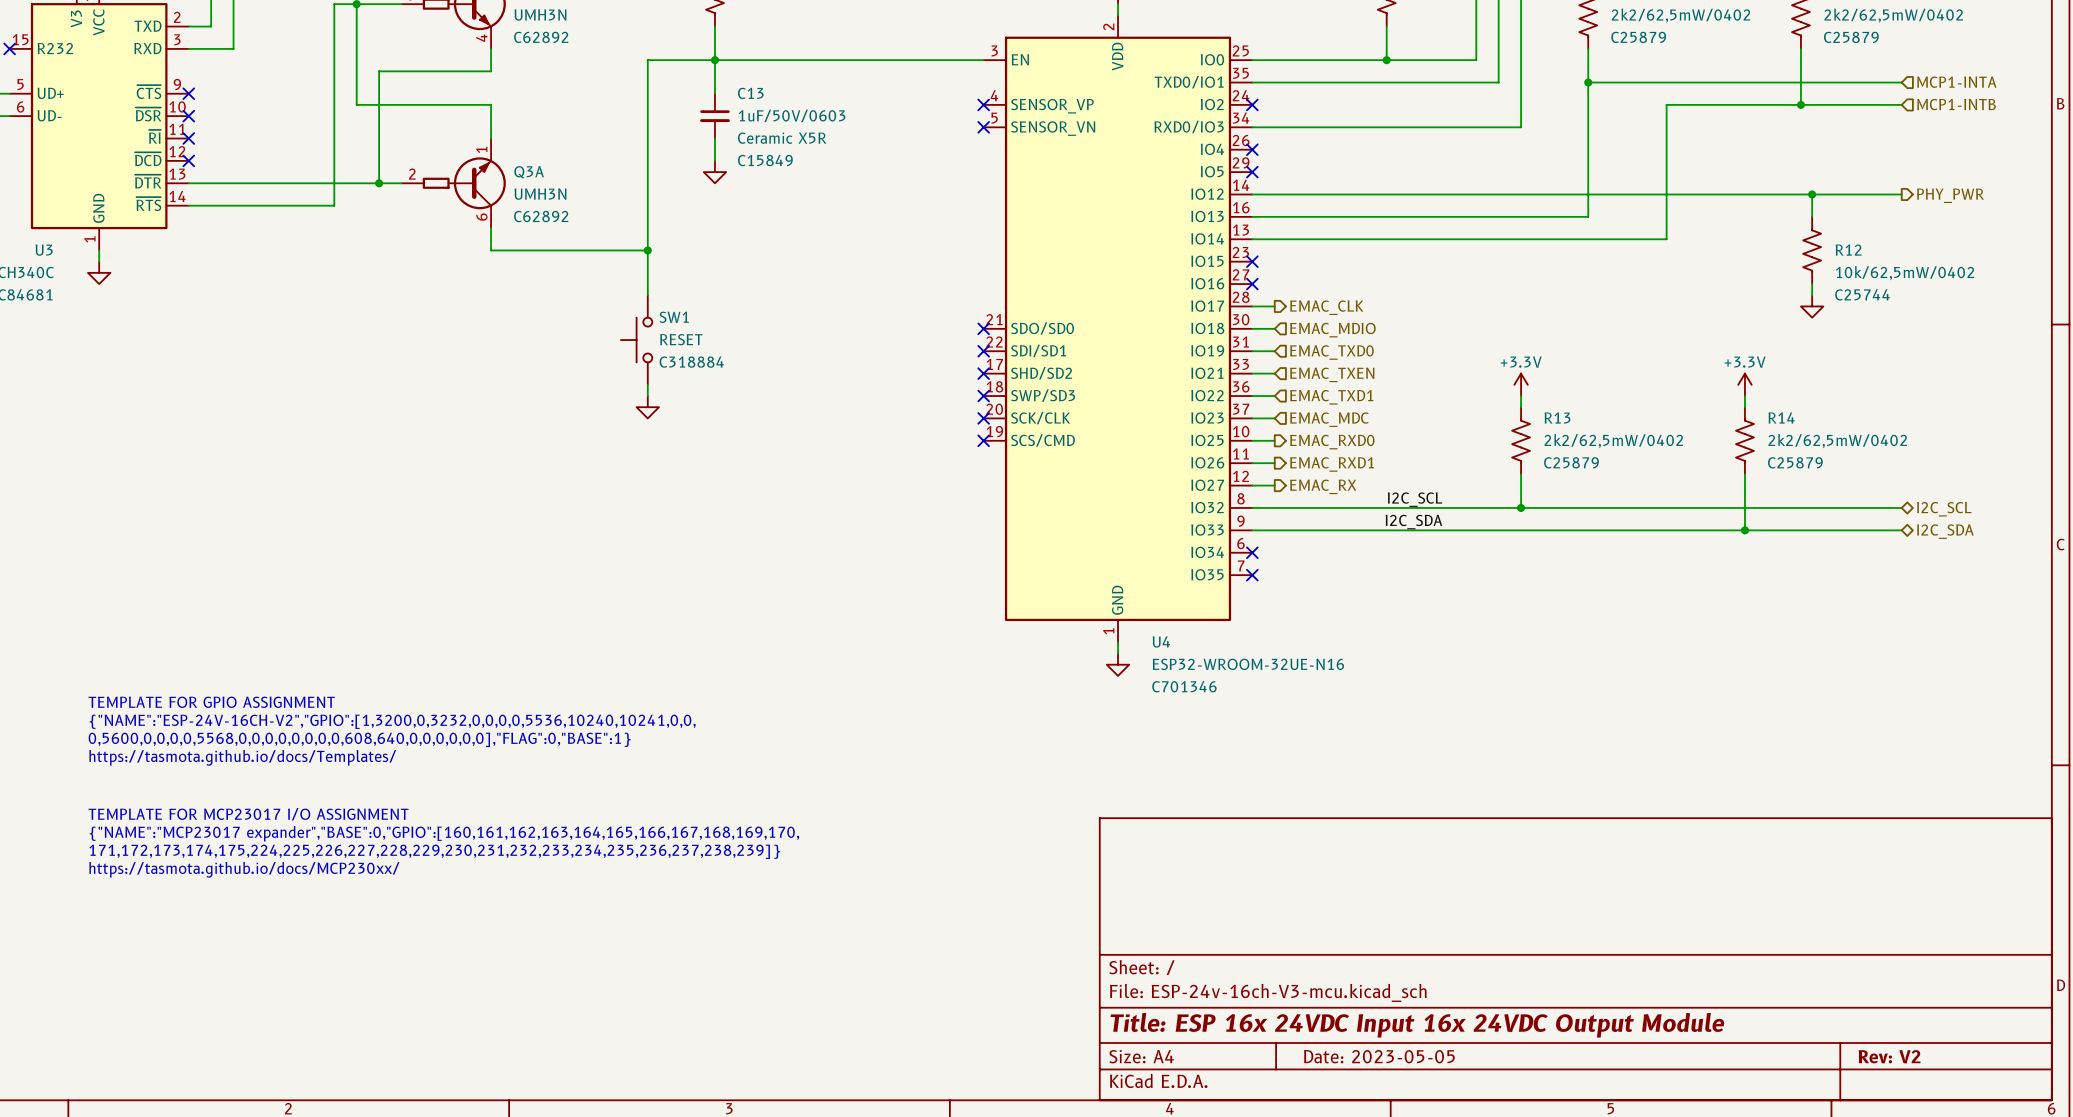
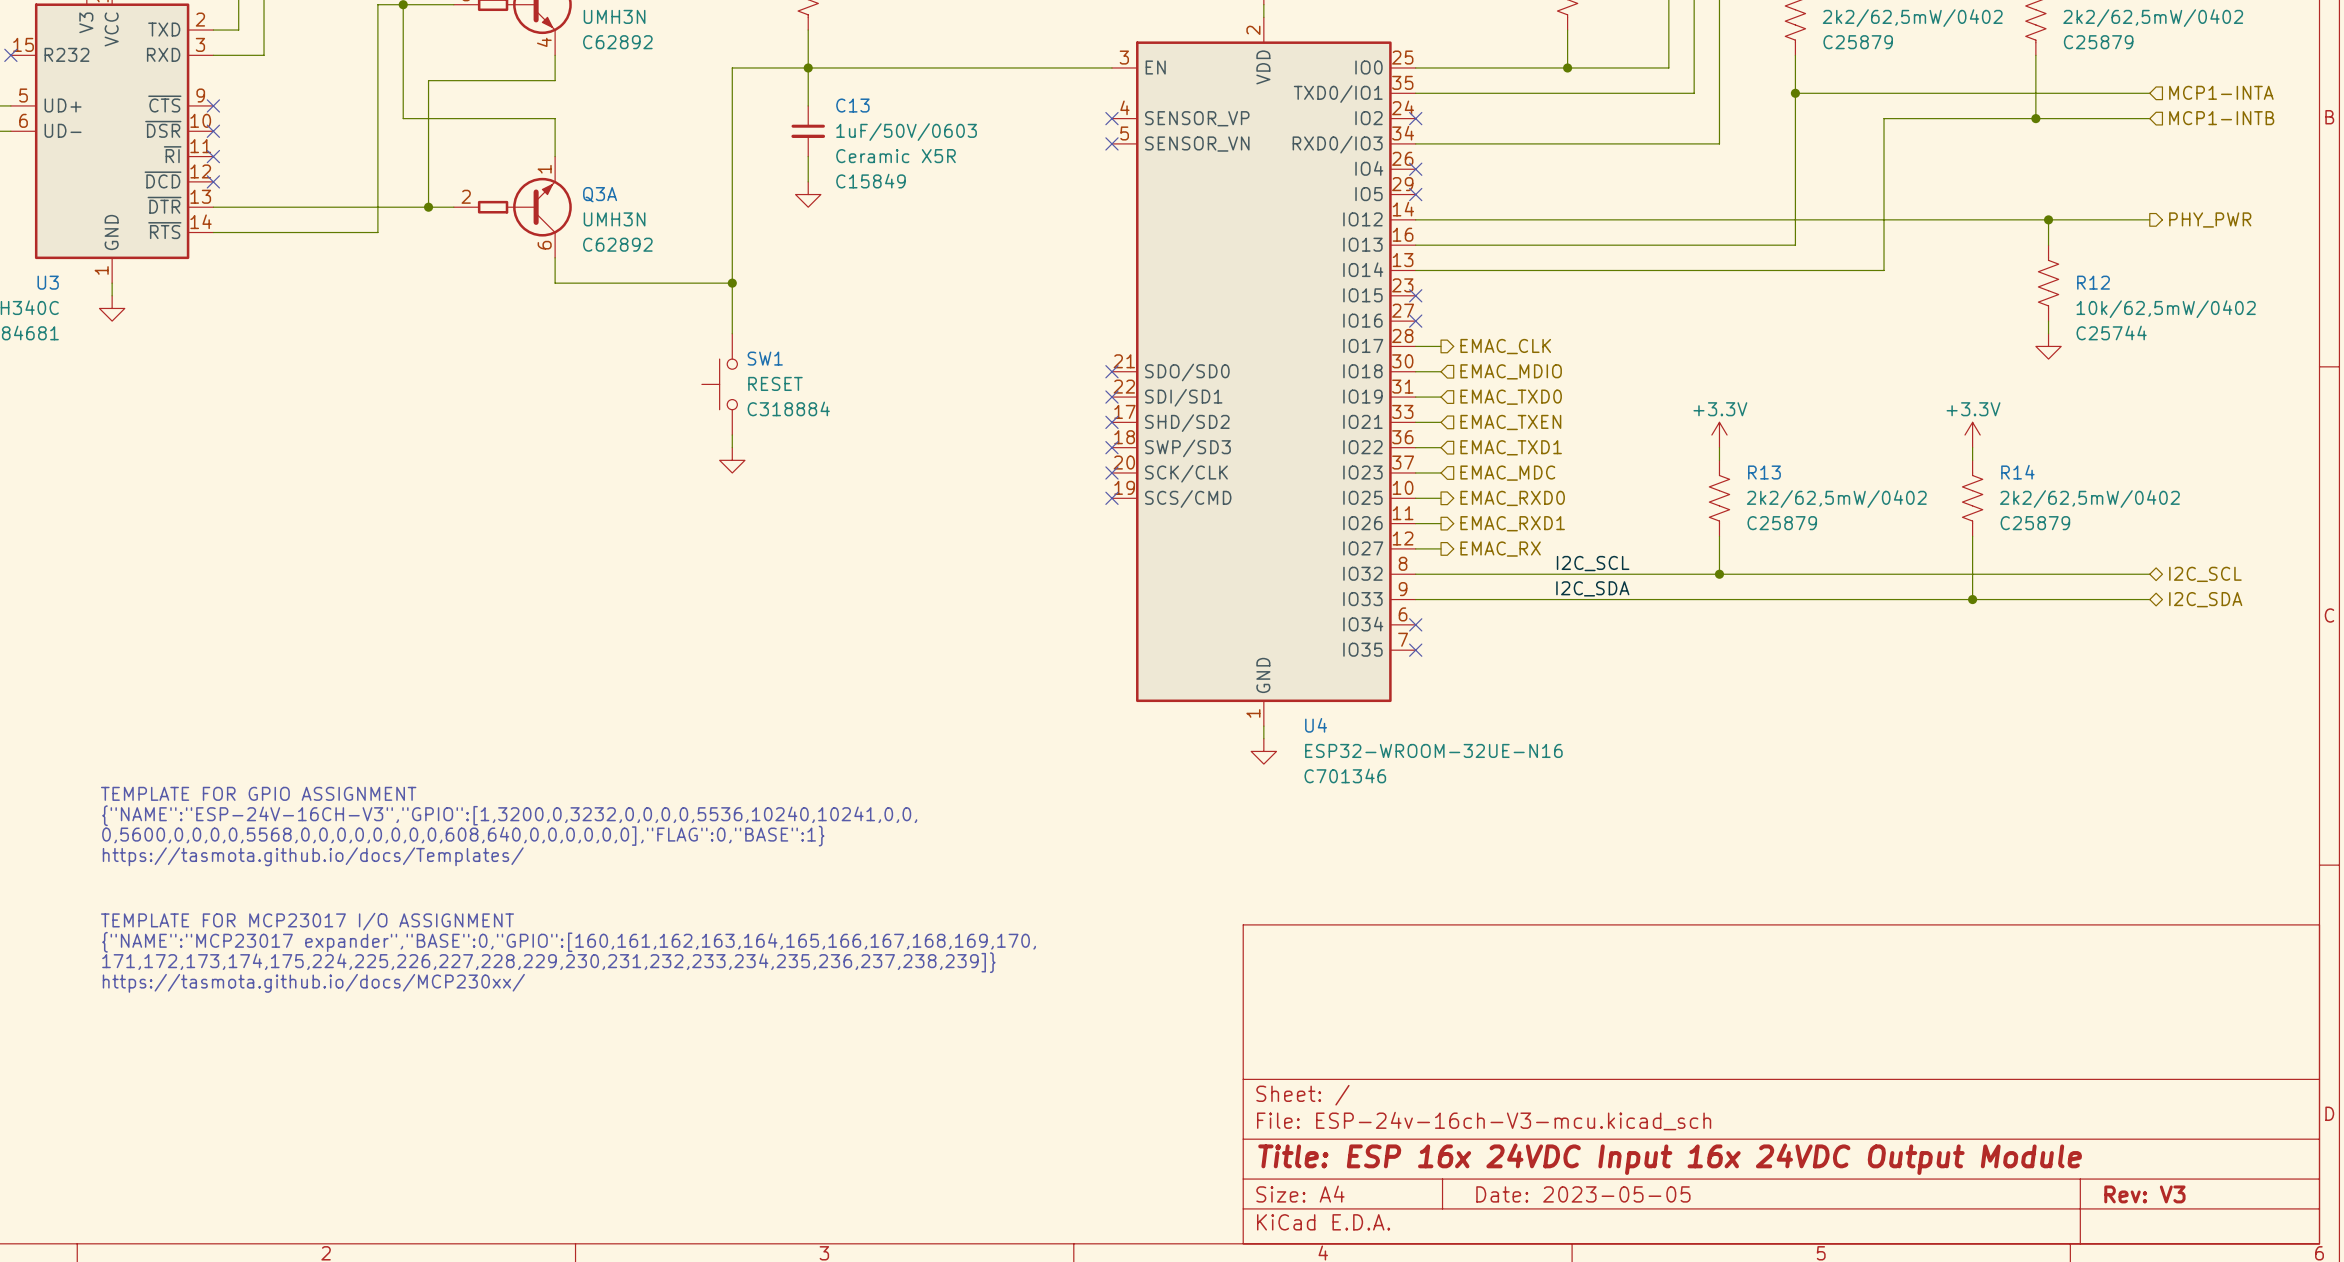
text: {"NAME":"ESP-24V-16CH-V2","GPIO":[1,3200,0,3232,0,0,0,0,5536,10240,10241,0,0, (392, 721) -> {"NAME":"ESP-24V-16CH-V3","GPIO":[1,3200,0,3232,0,0,0,0,5536,10240,10241,0,0, (509, 815)
title block: Rev: V2 (1889, 1056) -> Rev: V3 (2144, 1194)

